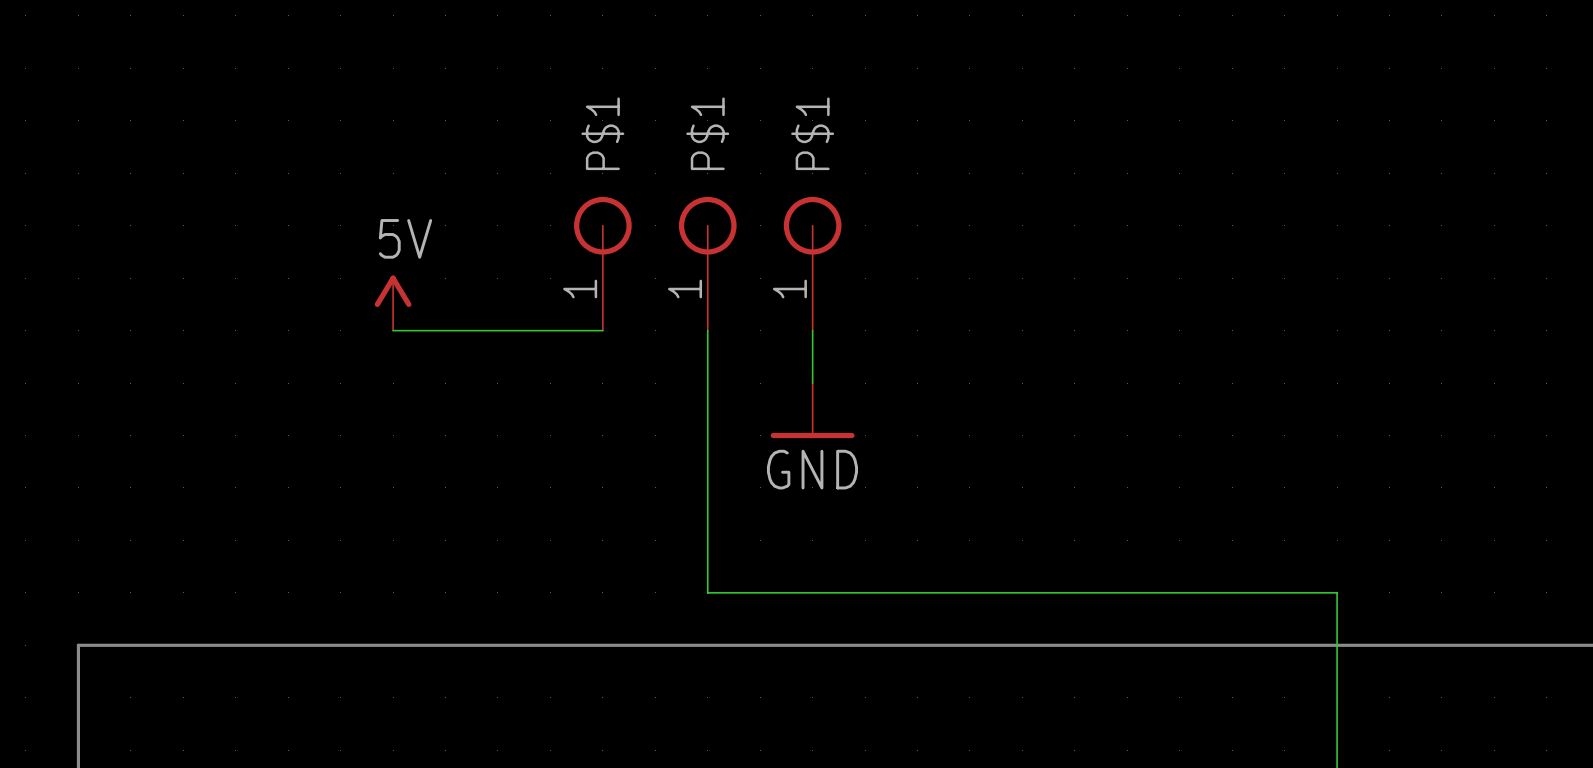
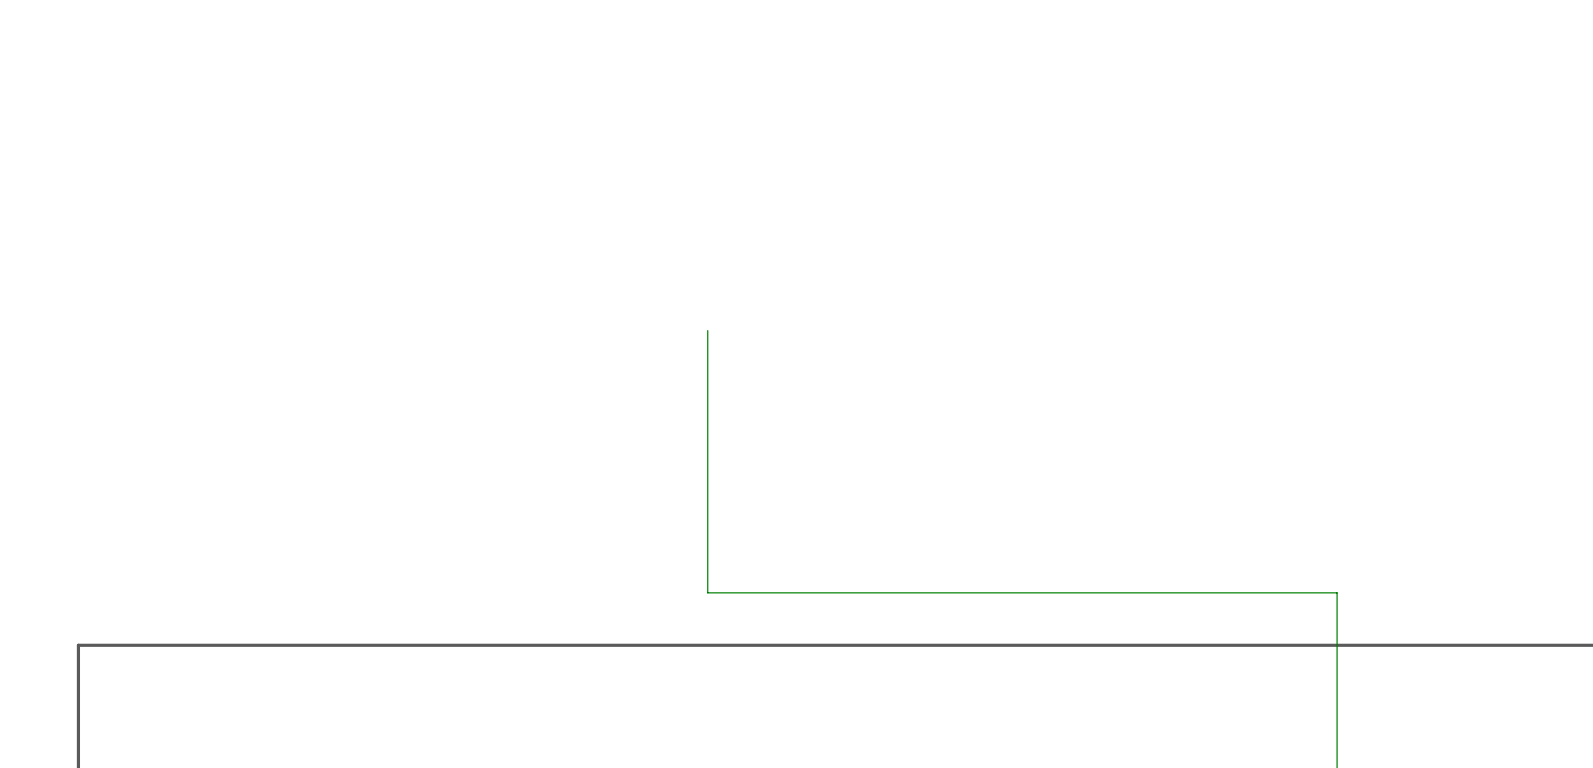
part: (602, 263) -> none
part: (707, 263) -> none
part: (812, 263) -> none
power symbol: 5V (393, 303) -> none
wire: (393, 330) (602, 330) -> none
wire: (812, 330) (812, 383) -> none
power symbol: GND (812, 410) -> none

